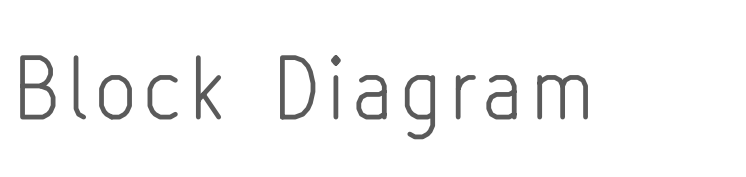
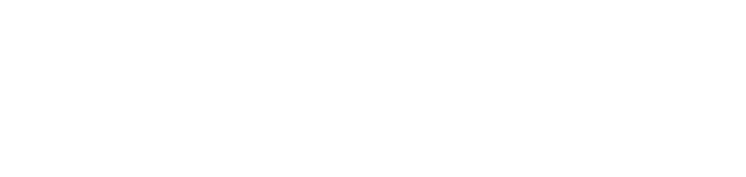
text: Block Diagram (304, 97) -> none

